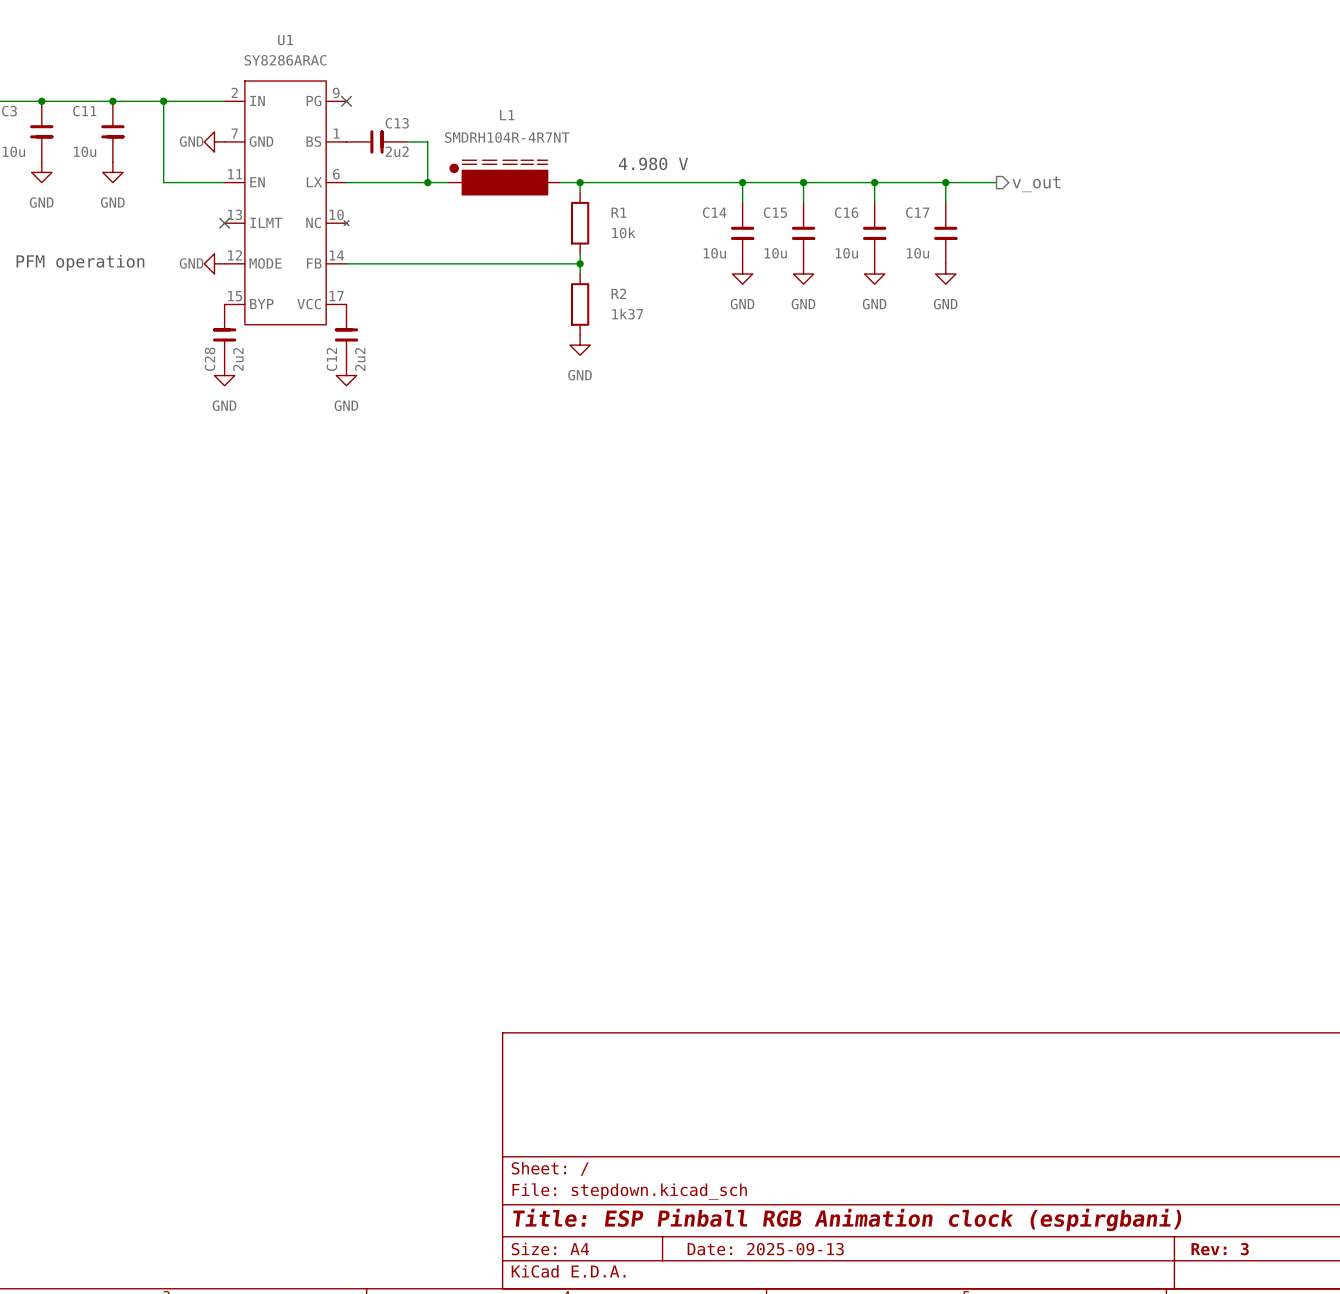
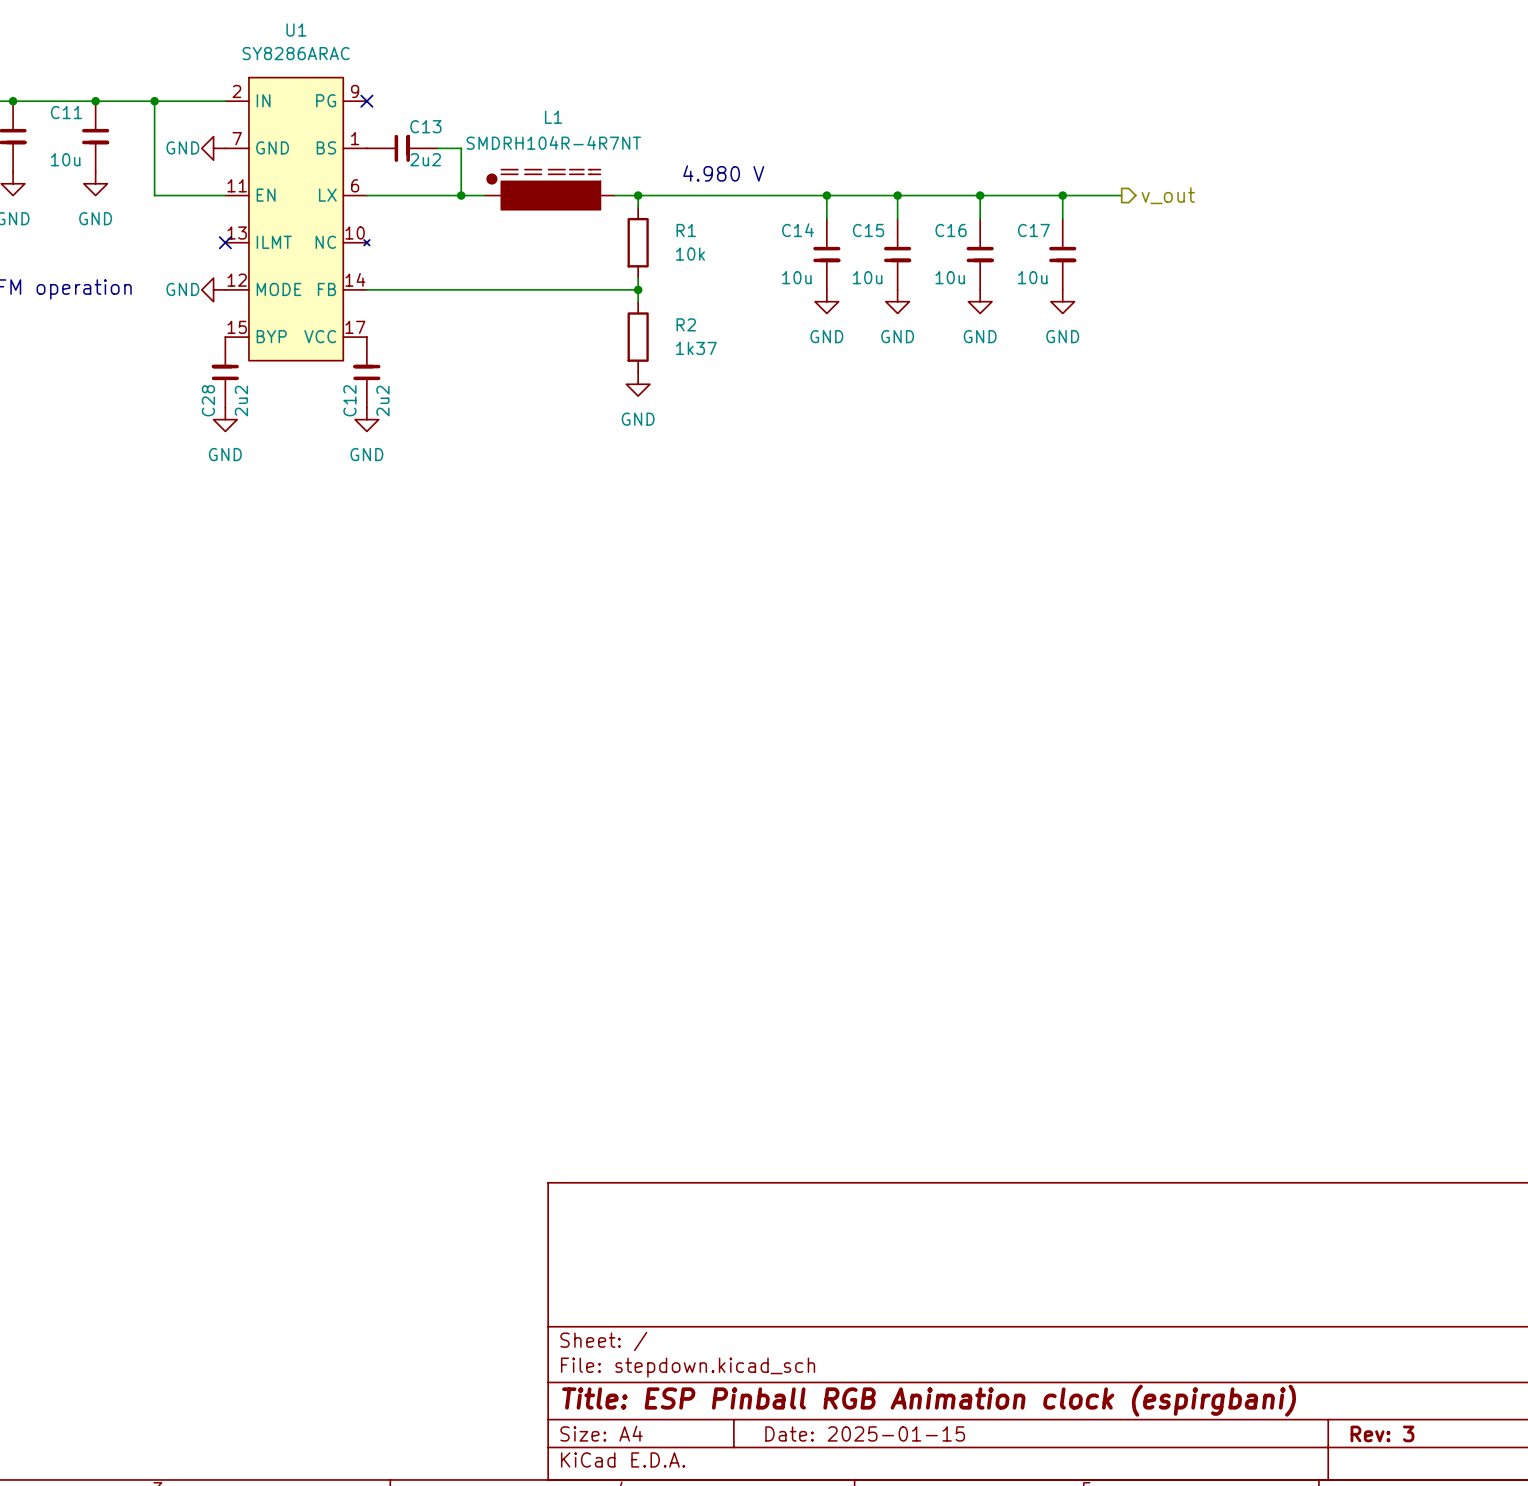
title block: Date: 2025-09-13 (765, 1249) -> Date: 2025-01-15 (865, 1433)

